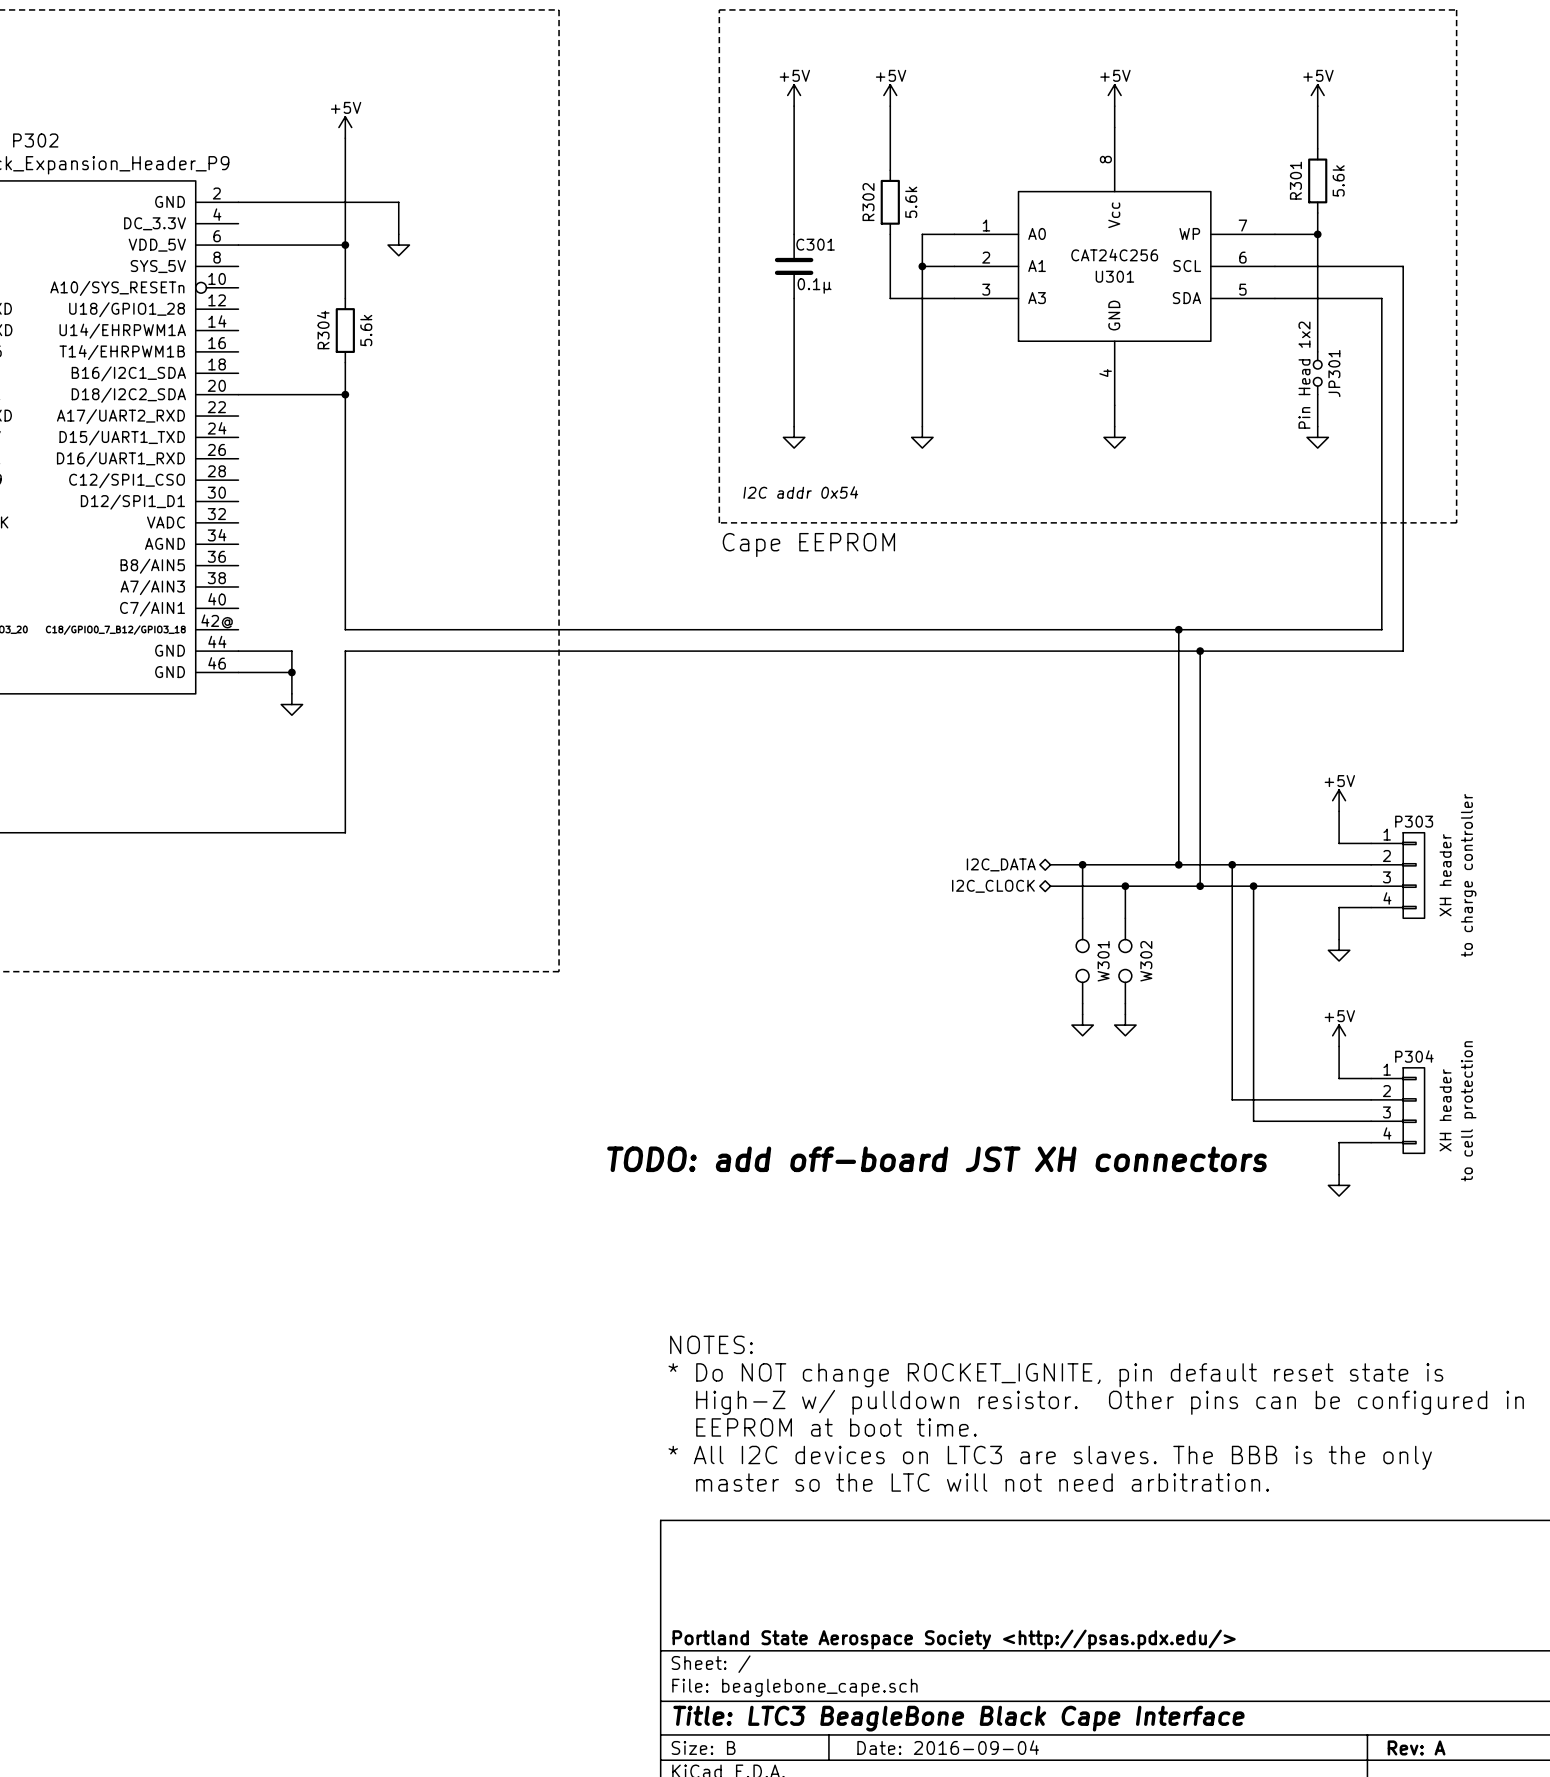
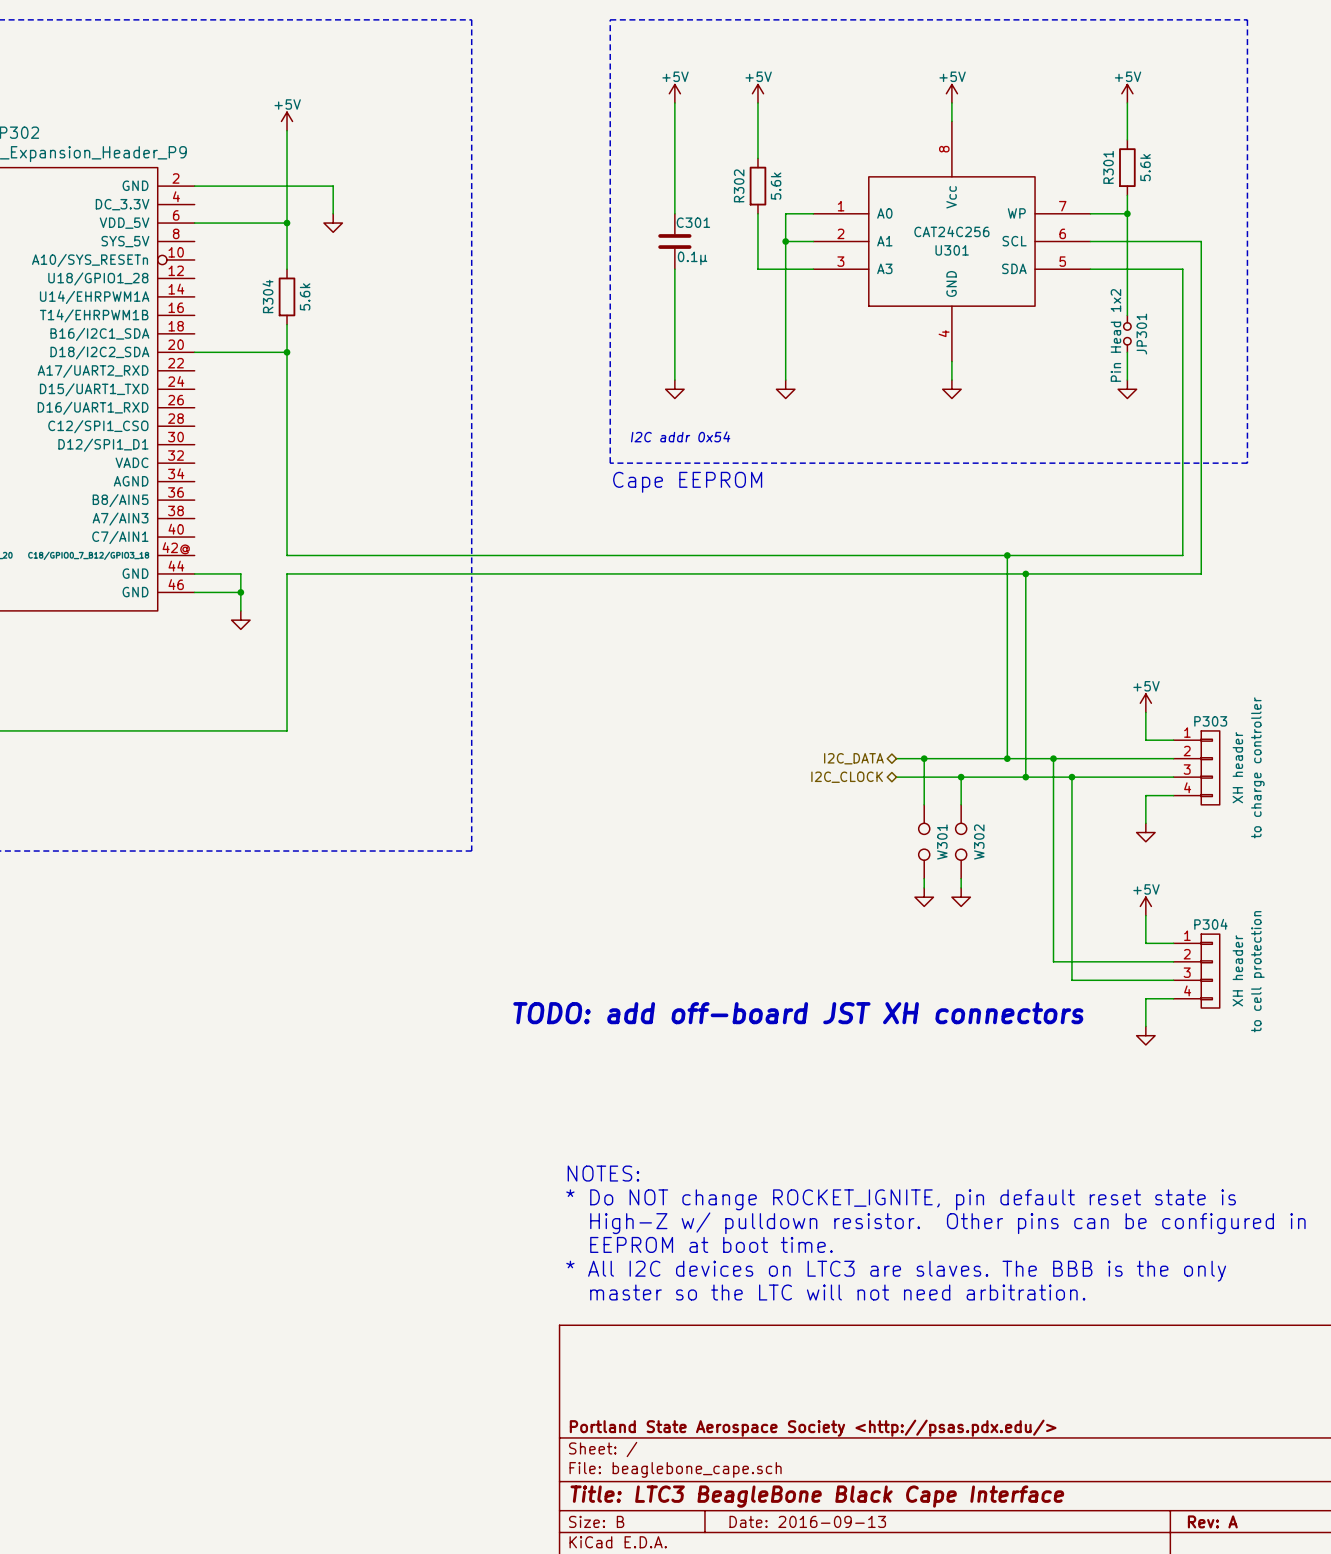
title block: Date: 2016-09-04 (948, 1747) -> Date: 2016-09-13 (807, 1521)

